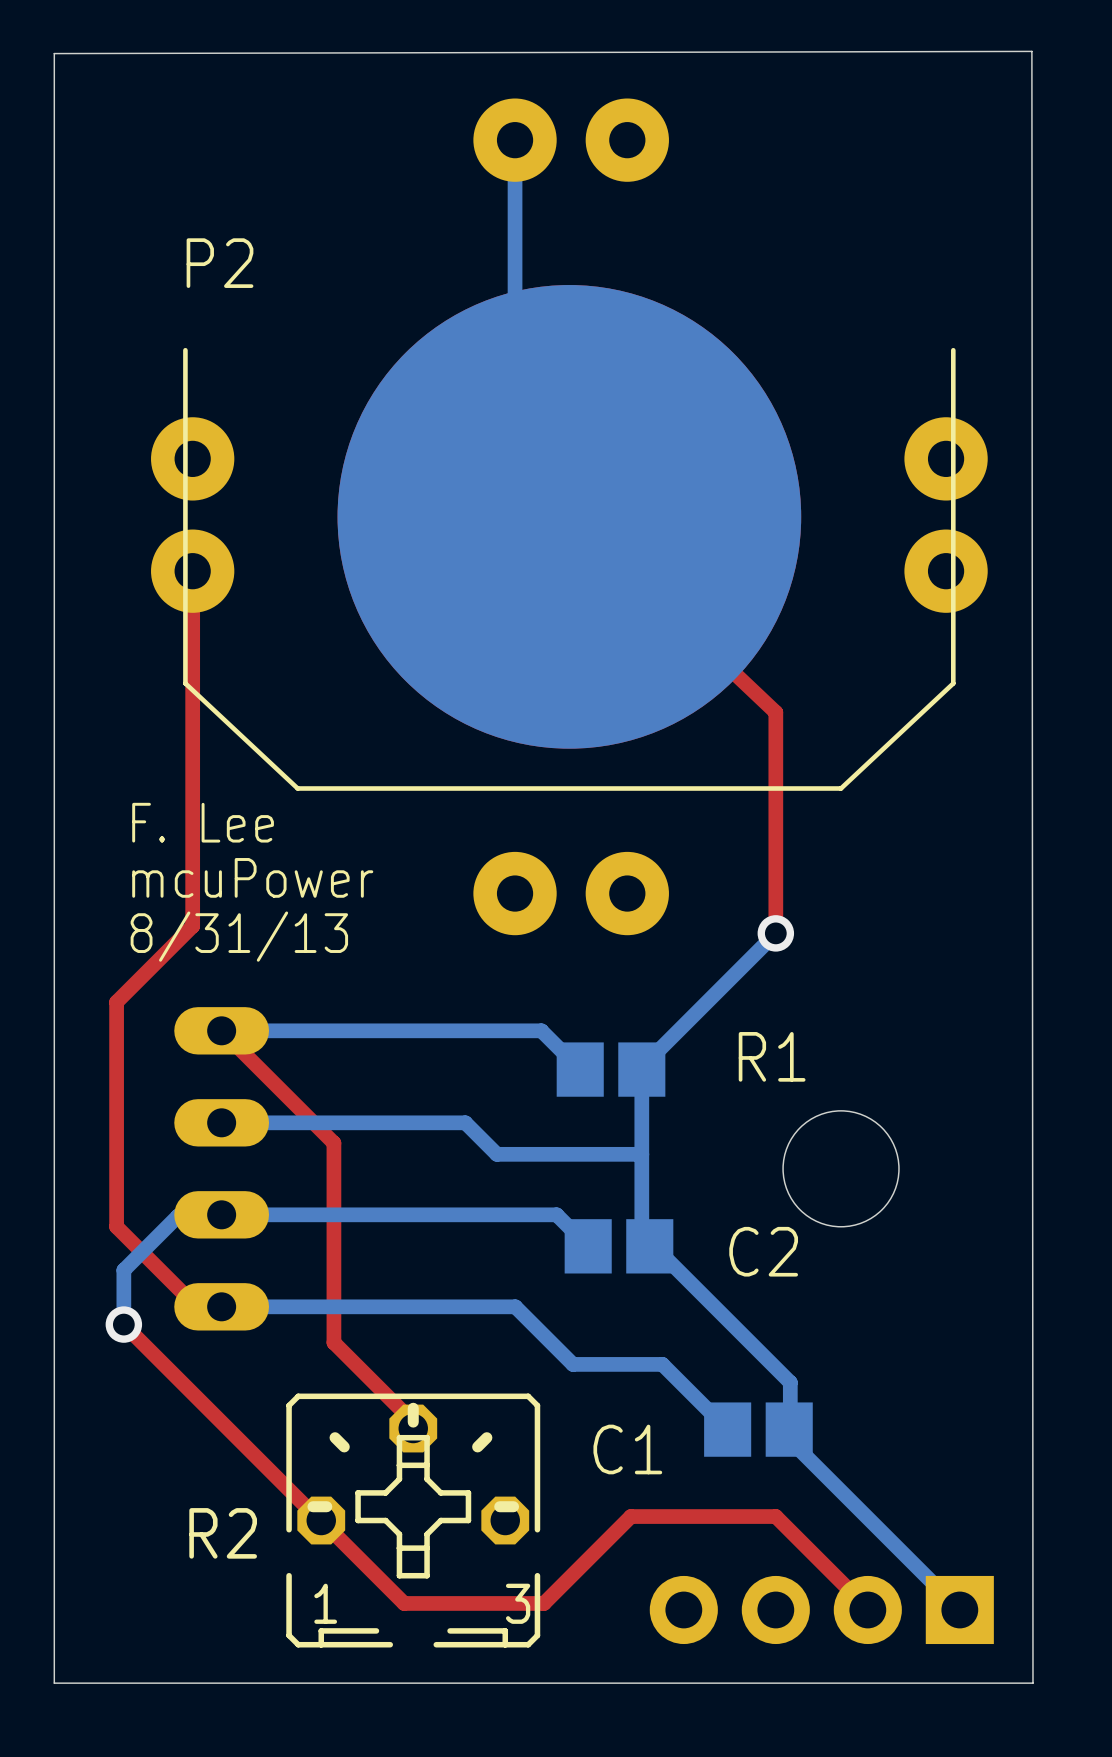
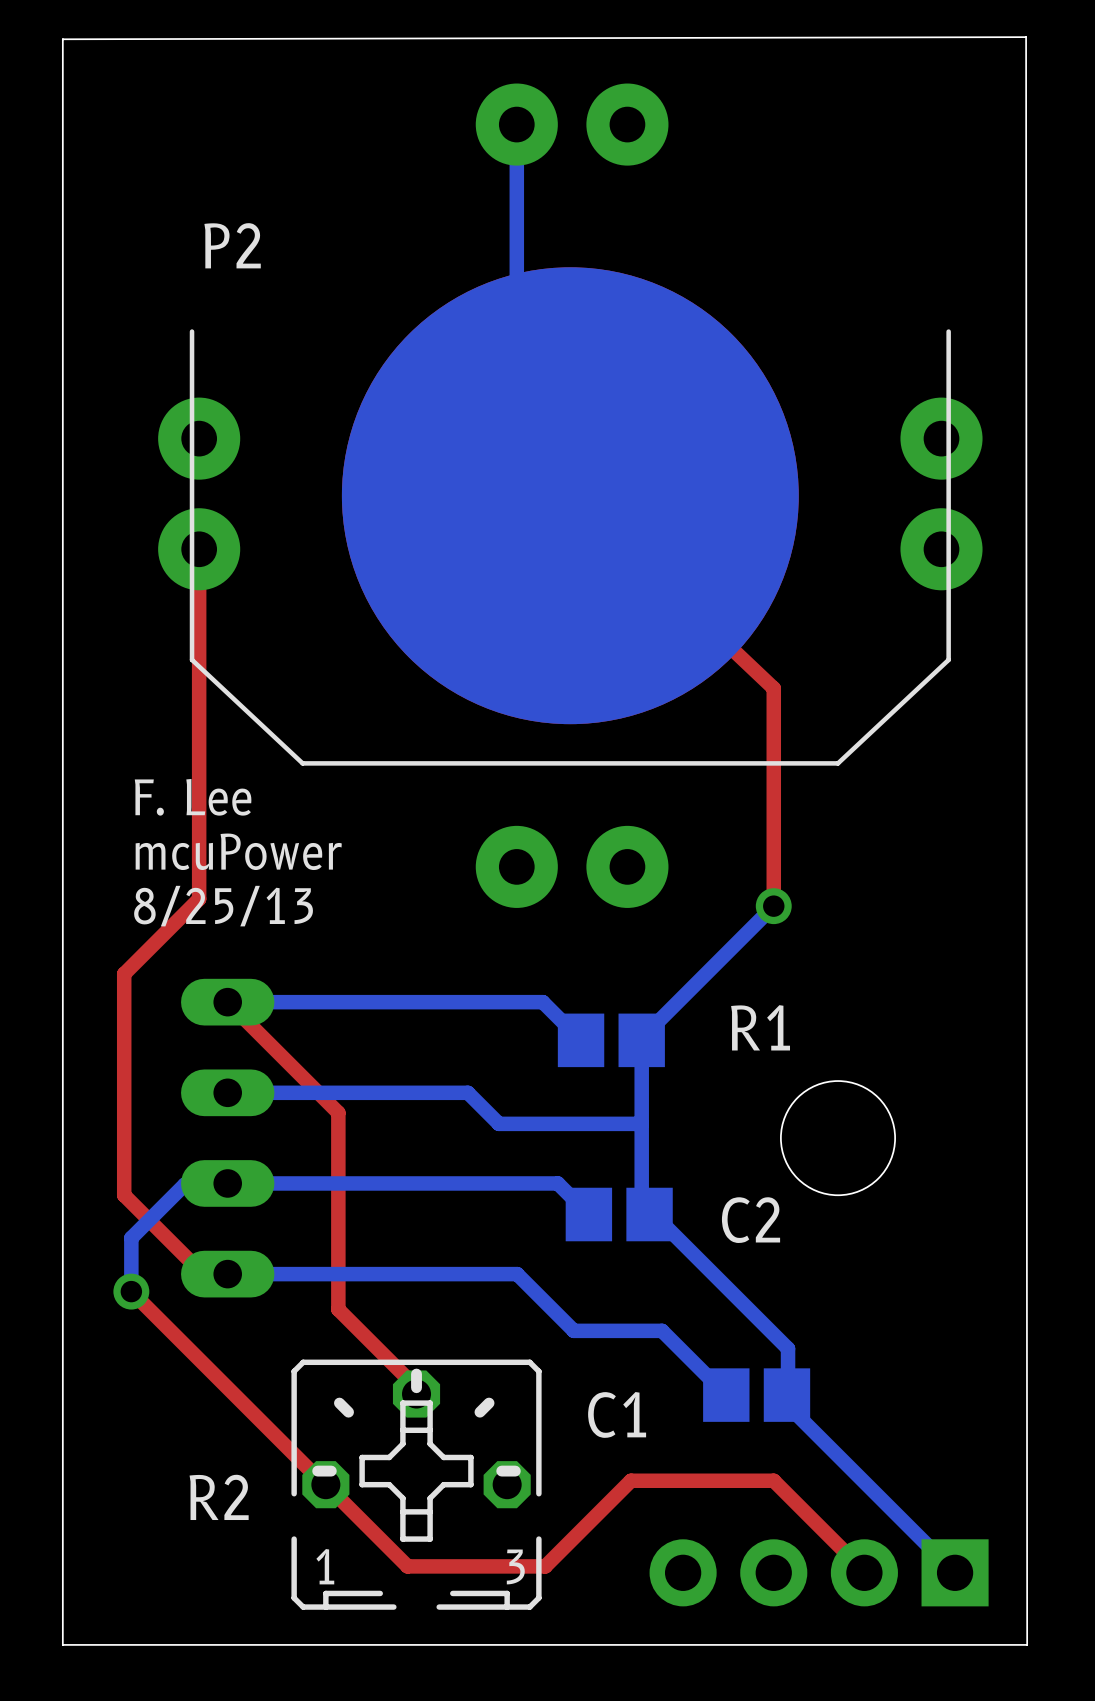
text: 8/31/13 (239, 936) -> 8/25/13 (223, 906)

